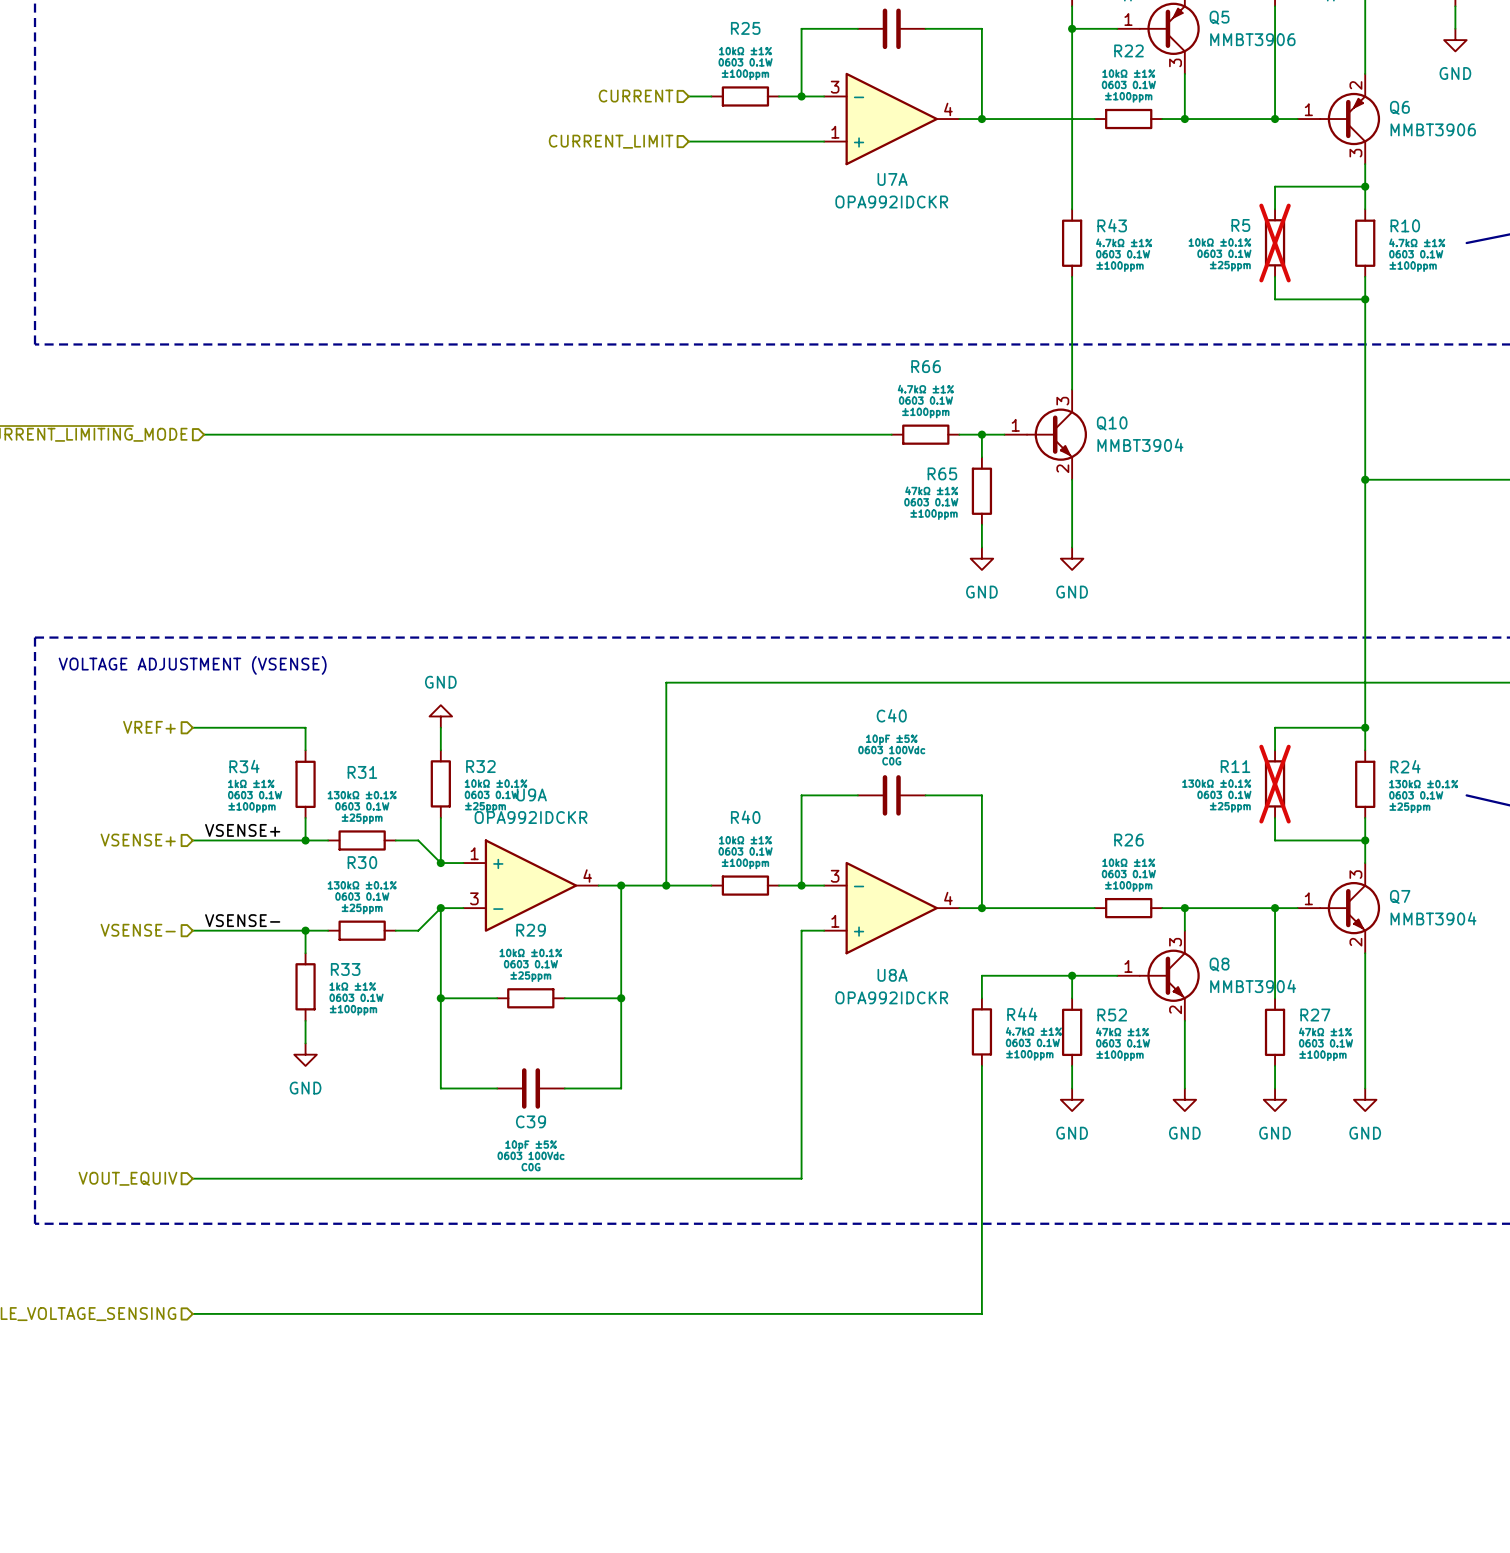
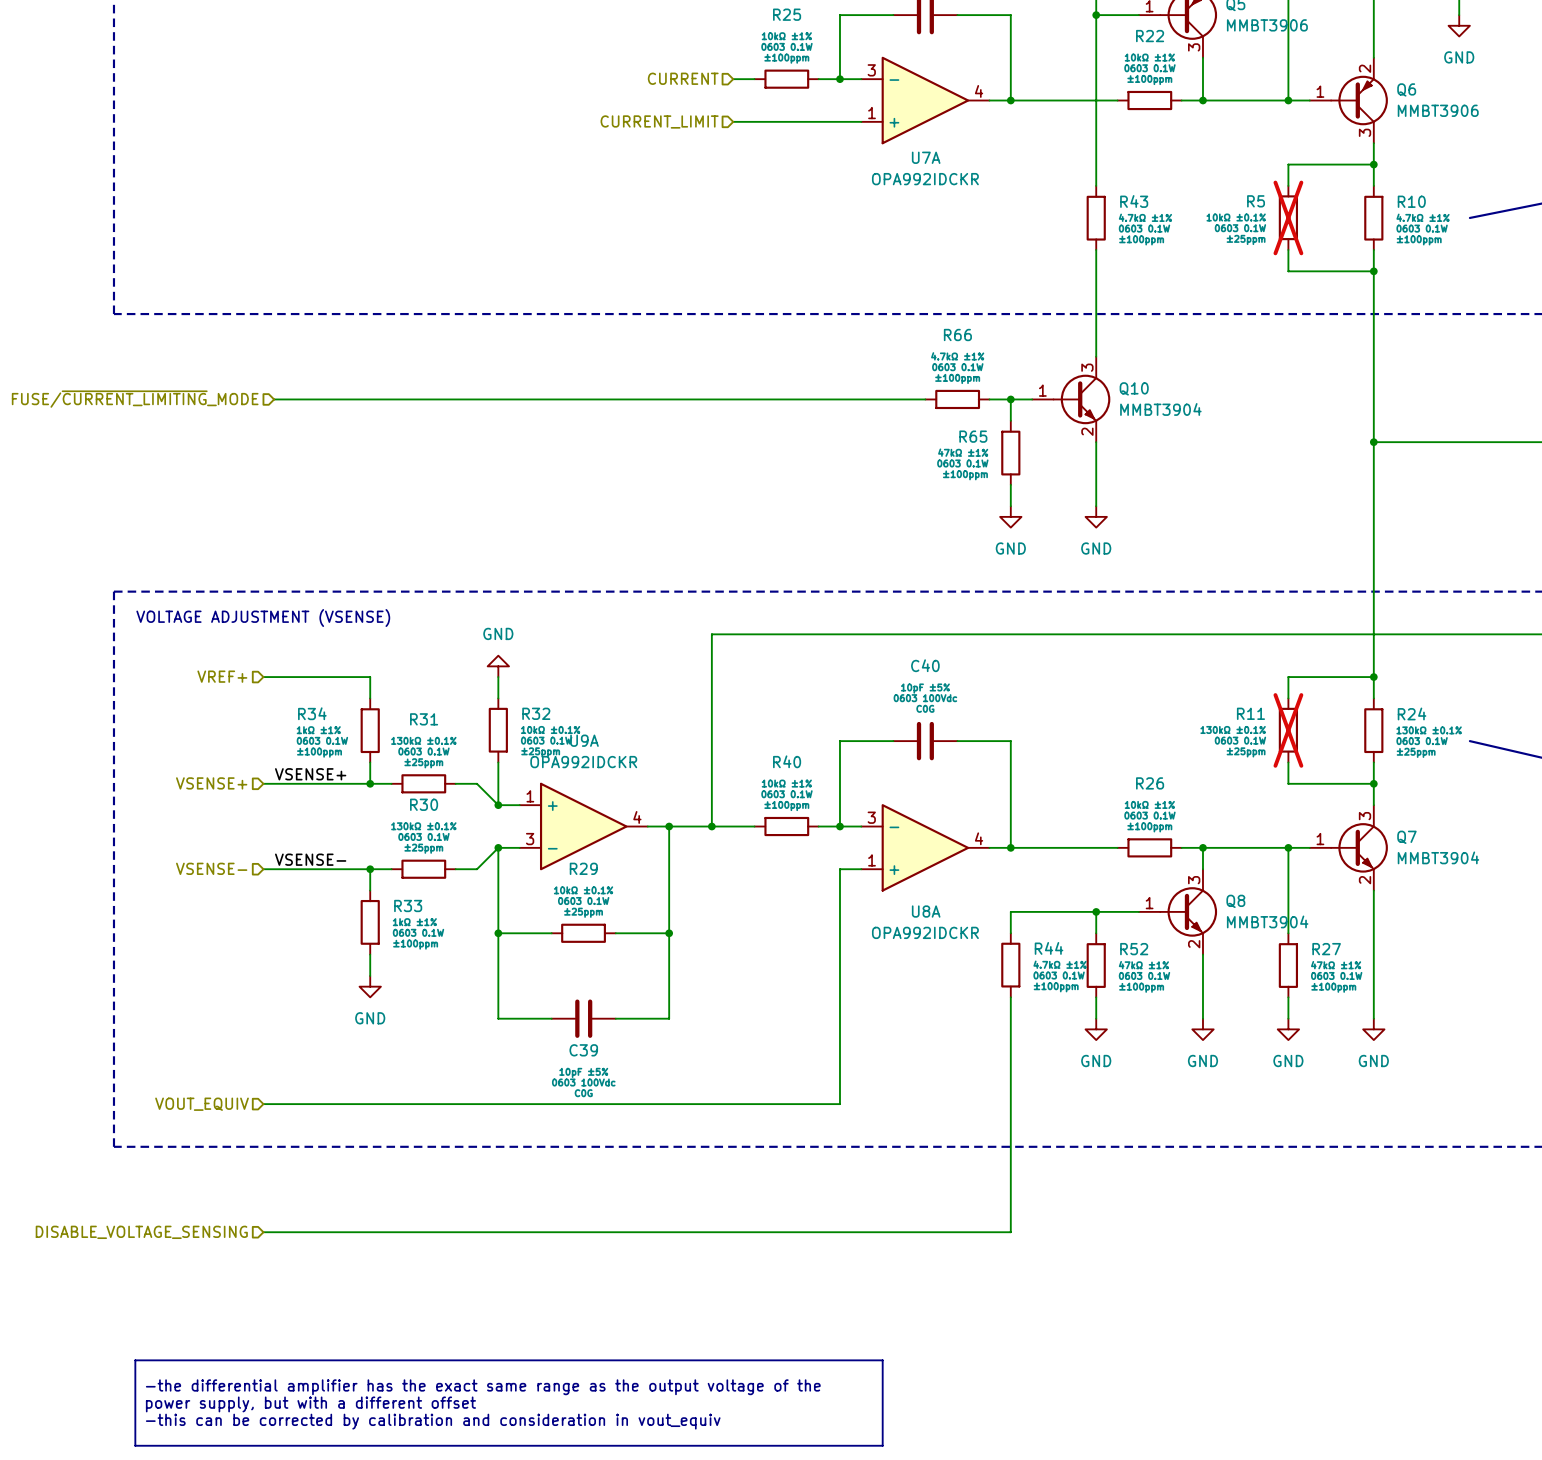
line: none -> (135, 1360) (882, 1360) (882, 1445) (135, 1445) (135, 1360)
text: none -> -the differential amplifier has the exact same range as the output voltage of the (483, 1387)
text: none -> power supply, but with a different offset (310, 1404)
text: none -> -this can be corrected by calibration and consideration in vout_equiv (433, 1421)

